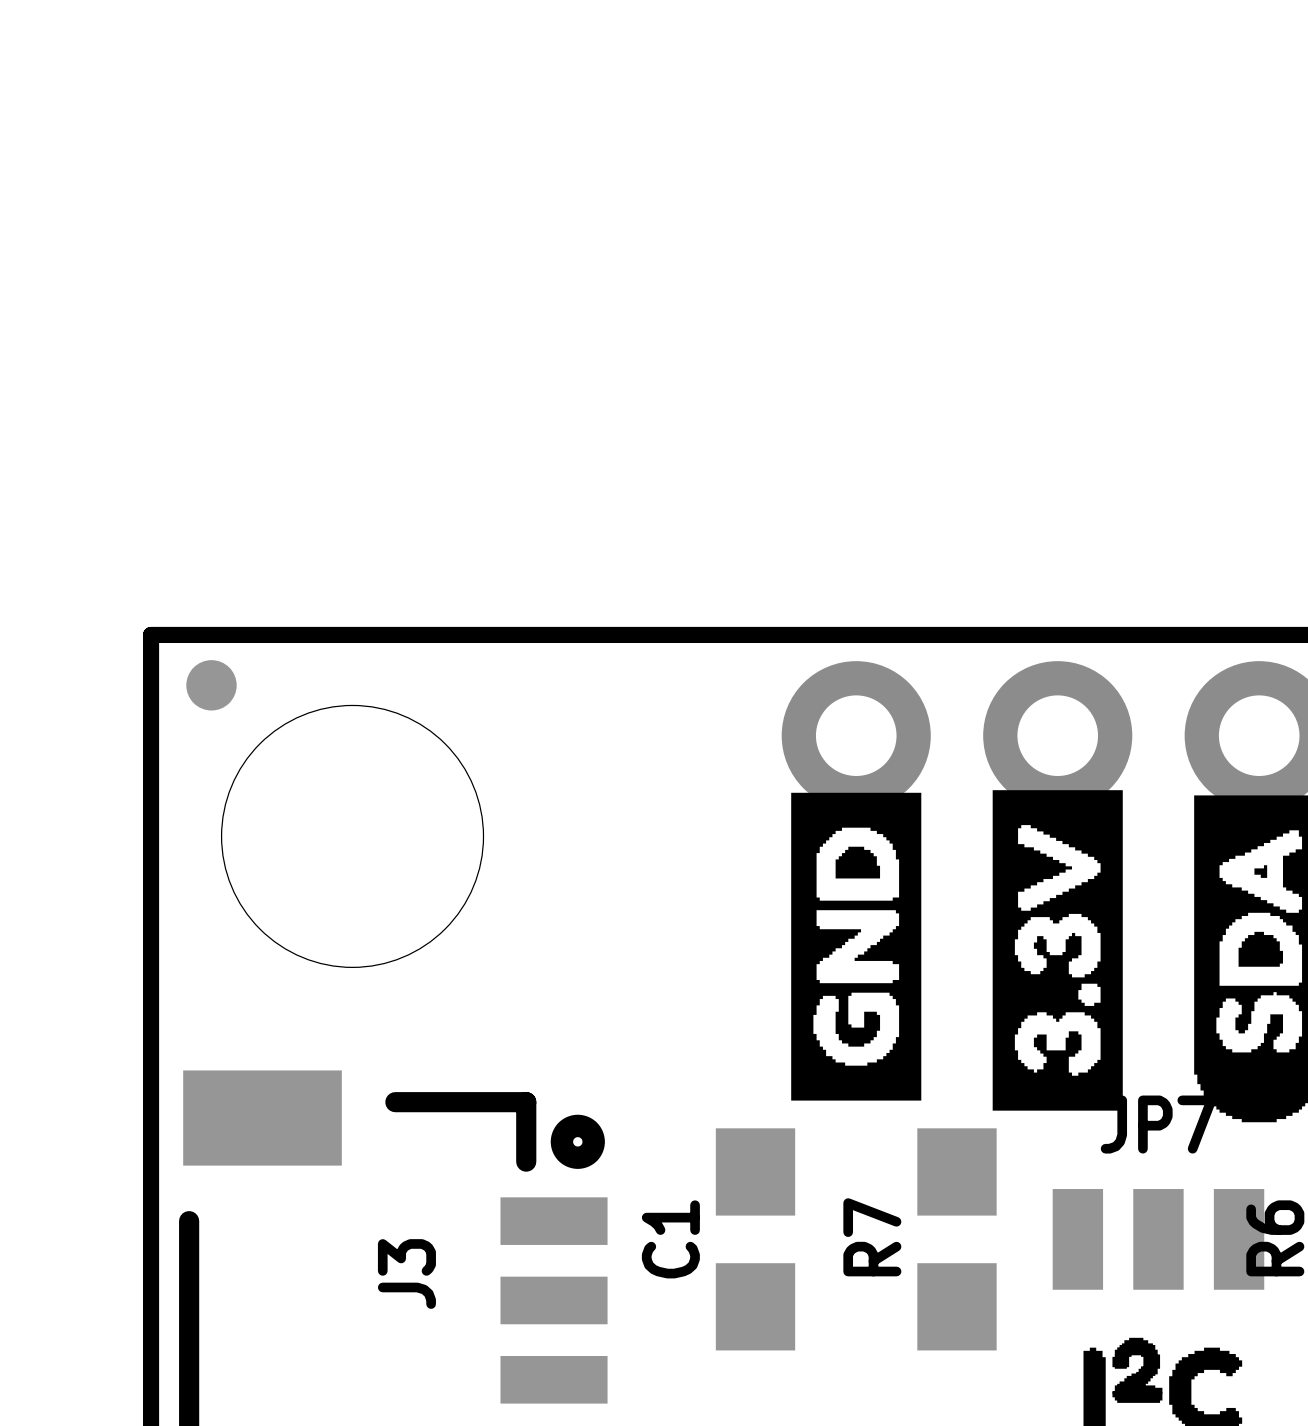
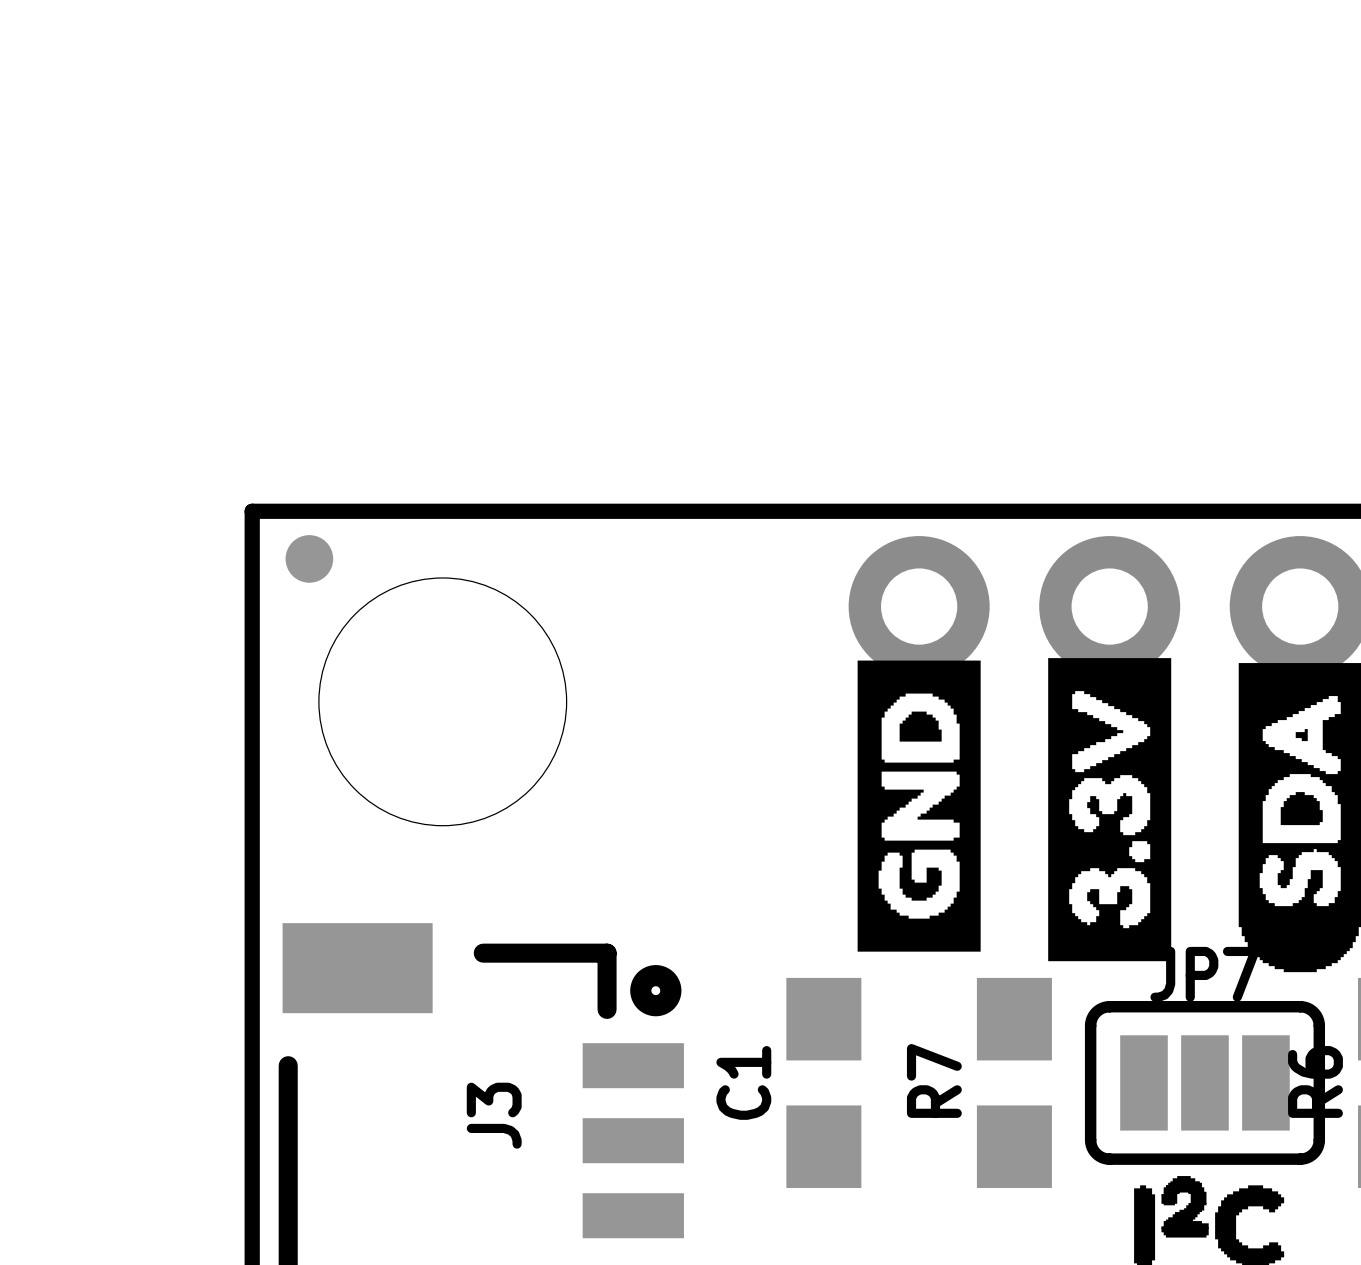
JP7 footprint: [1052, 1189, 1265, 1290] -> [1084, 1001, 1326, 1165]

